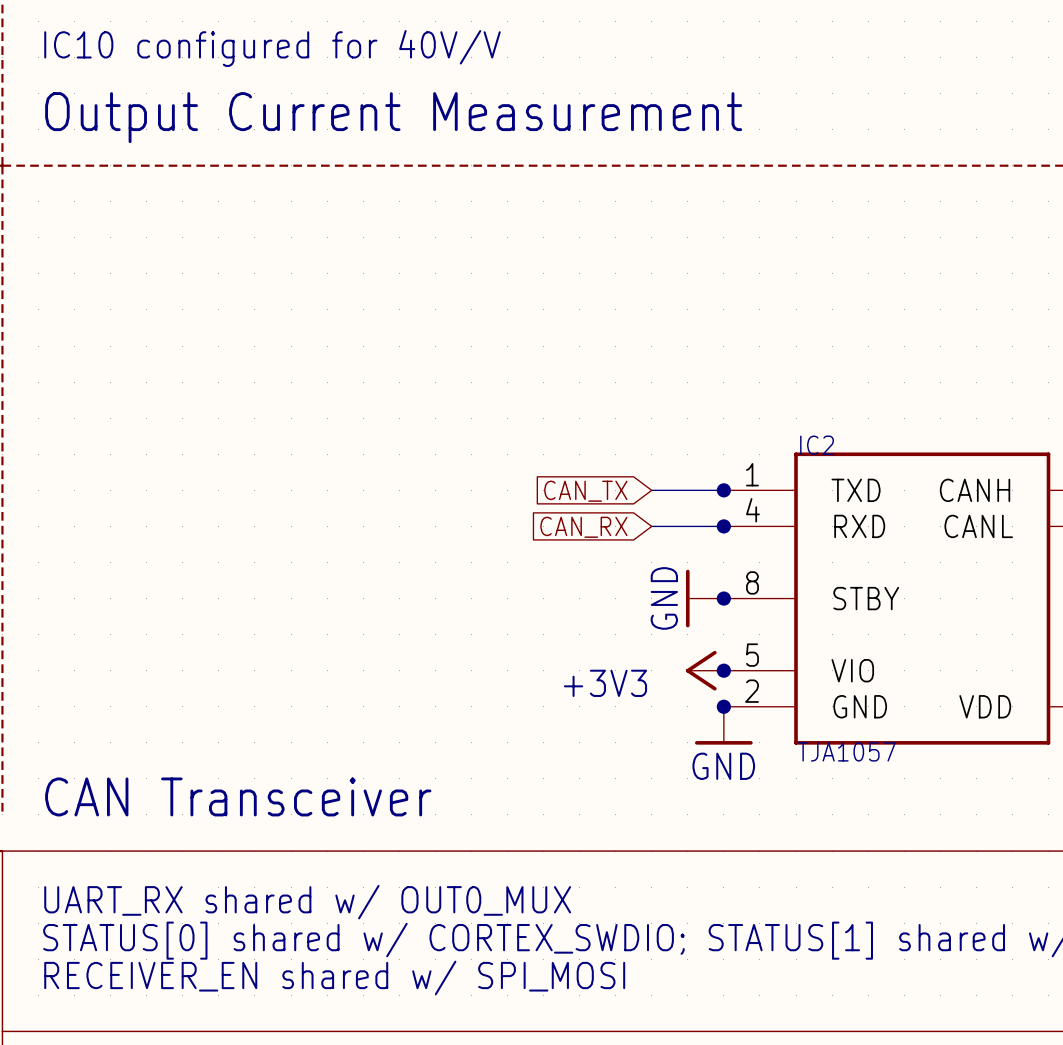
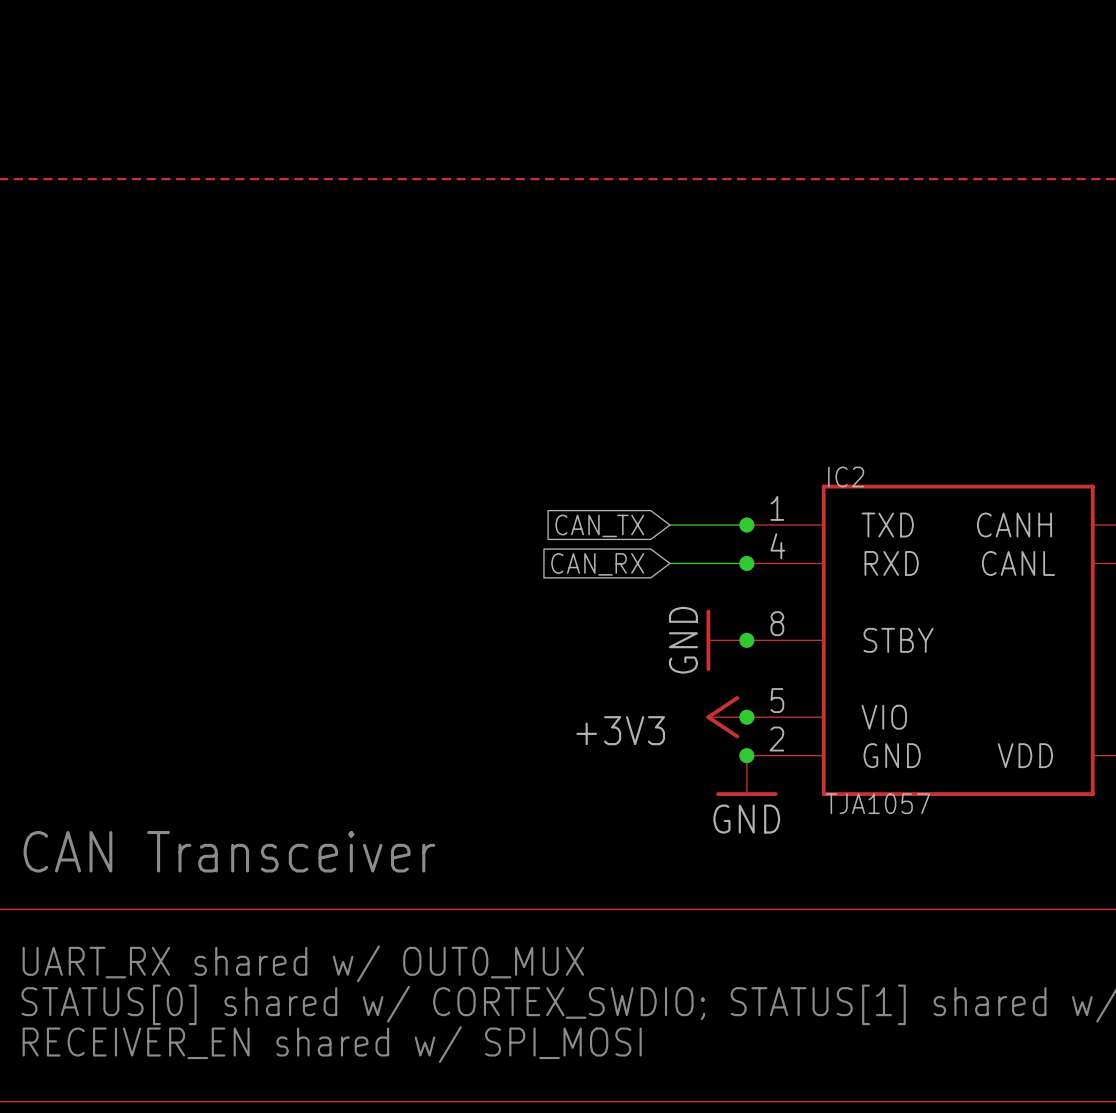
text: IC10 configured for 40V/V (272, 48) -> none
text: Output Current Measurement (393, 117) -> none

